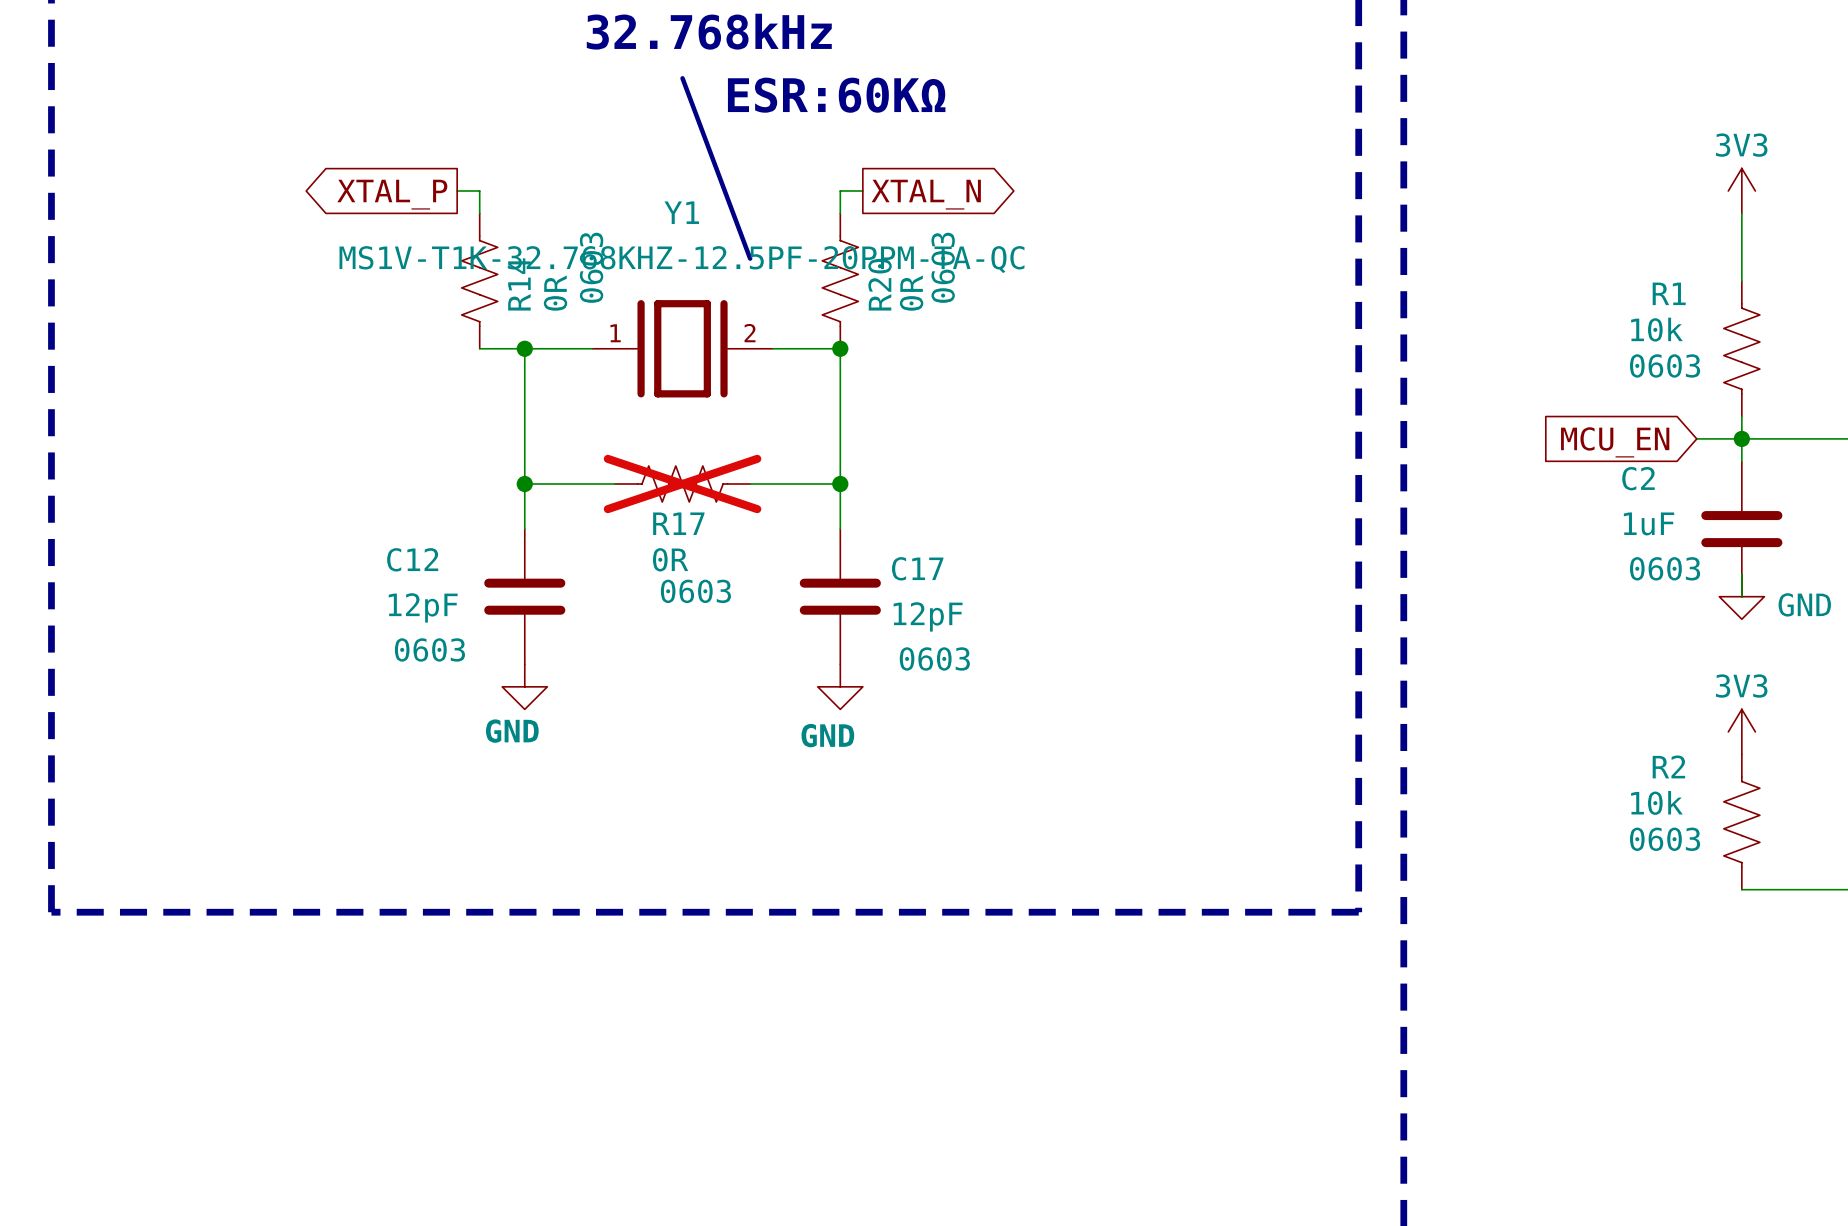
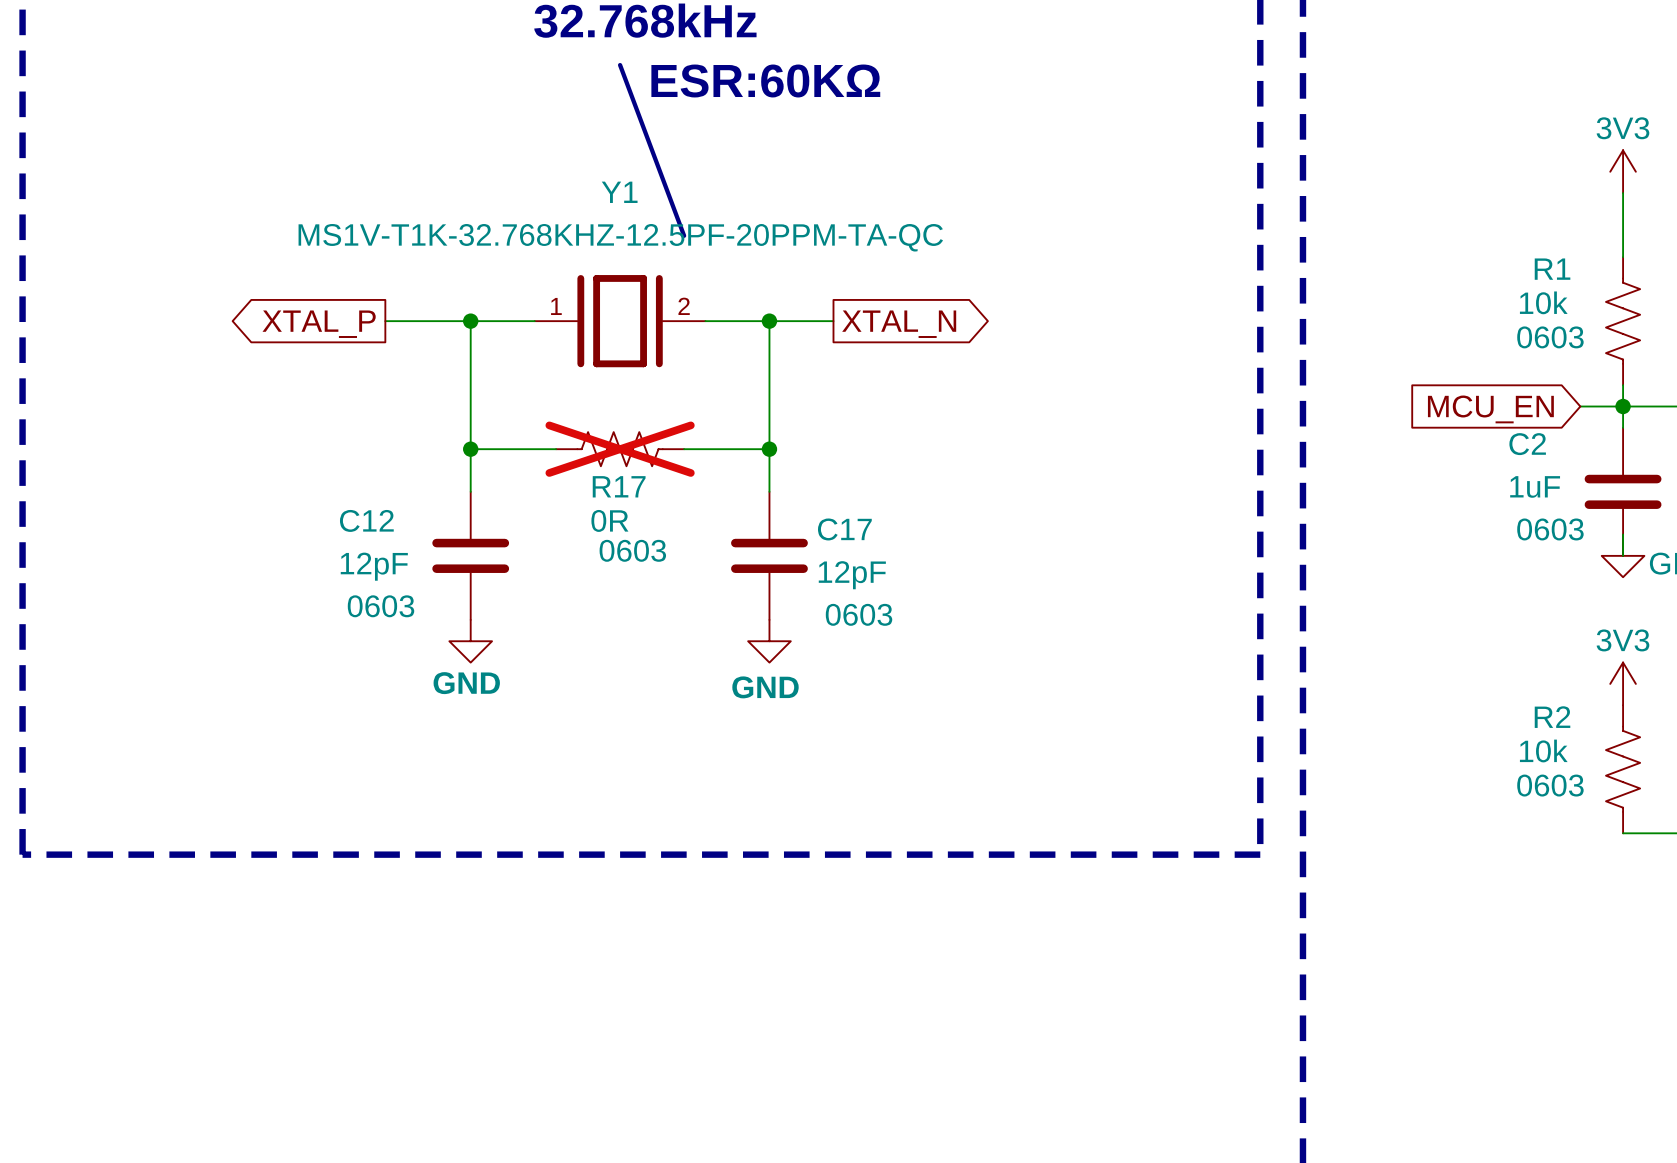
wire: (457, 191) (479, 191) (479, 213) -> none
wire: (862, 191) (840, 191) (840, 213) -> none
global label position: XTAL_P (392, 194) -> XTAL_P (319, 324)
global label position: XTAL_N (926, 194) -> XTAL_N (899, 324)
R14: 0R (479, 281) -> none
R20: 0R (840, 281) -> none
wire: none -> (385, 321) (428, 321)
wire: none -> (769, 321) (833, 321)

